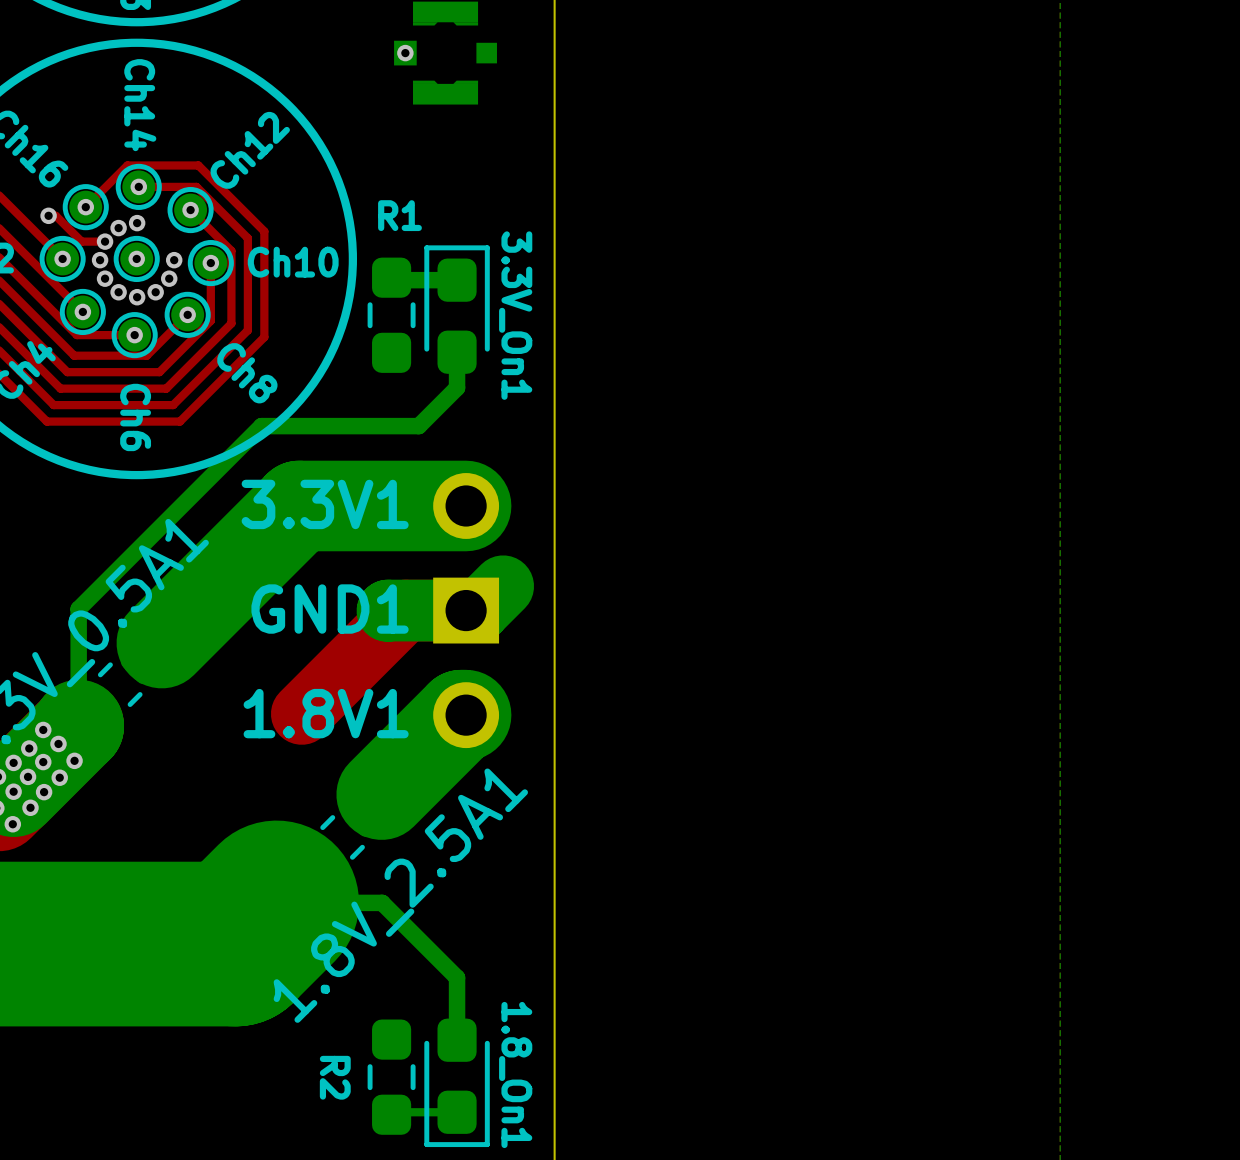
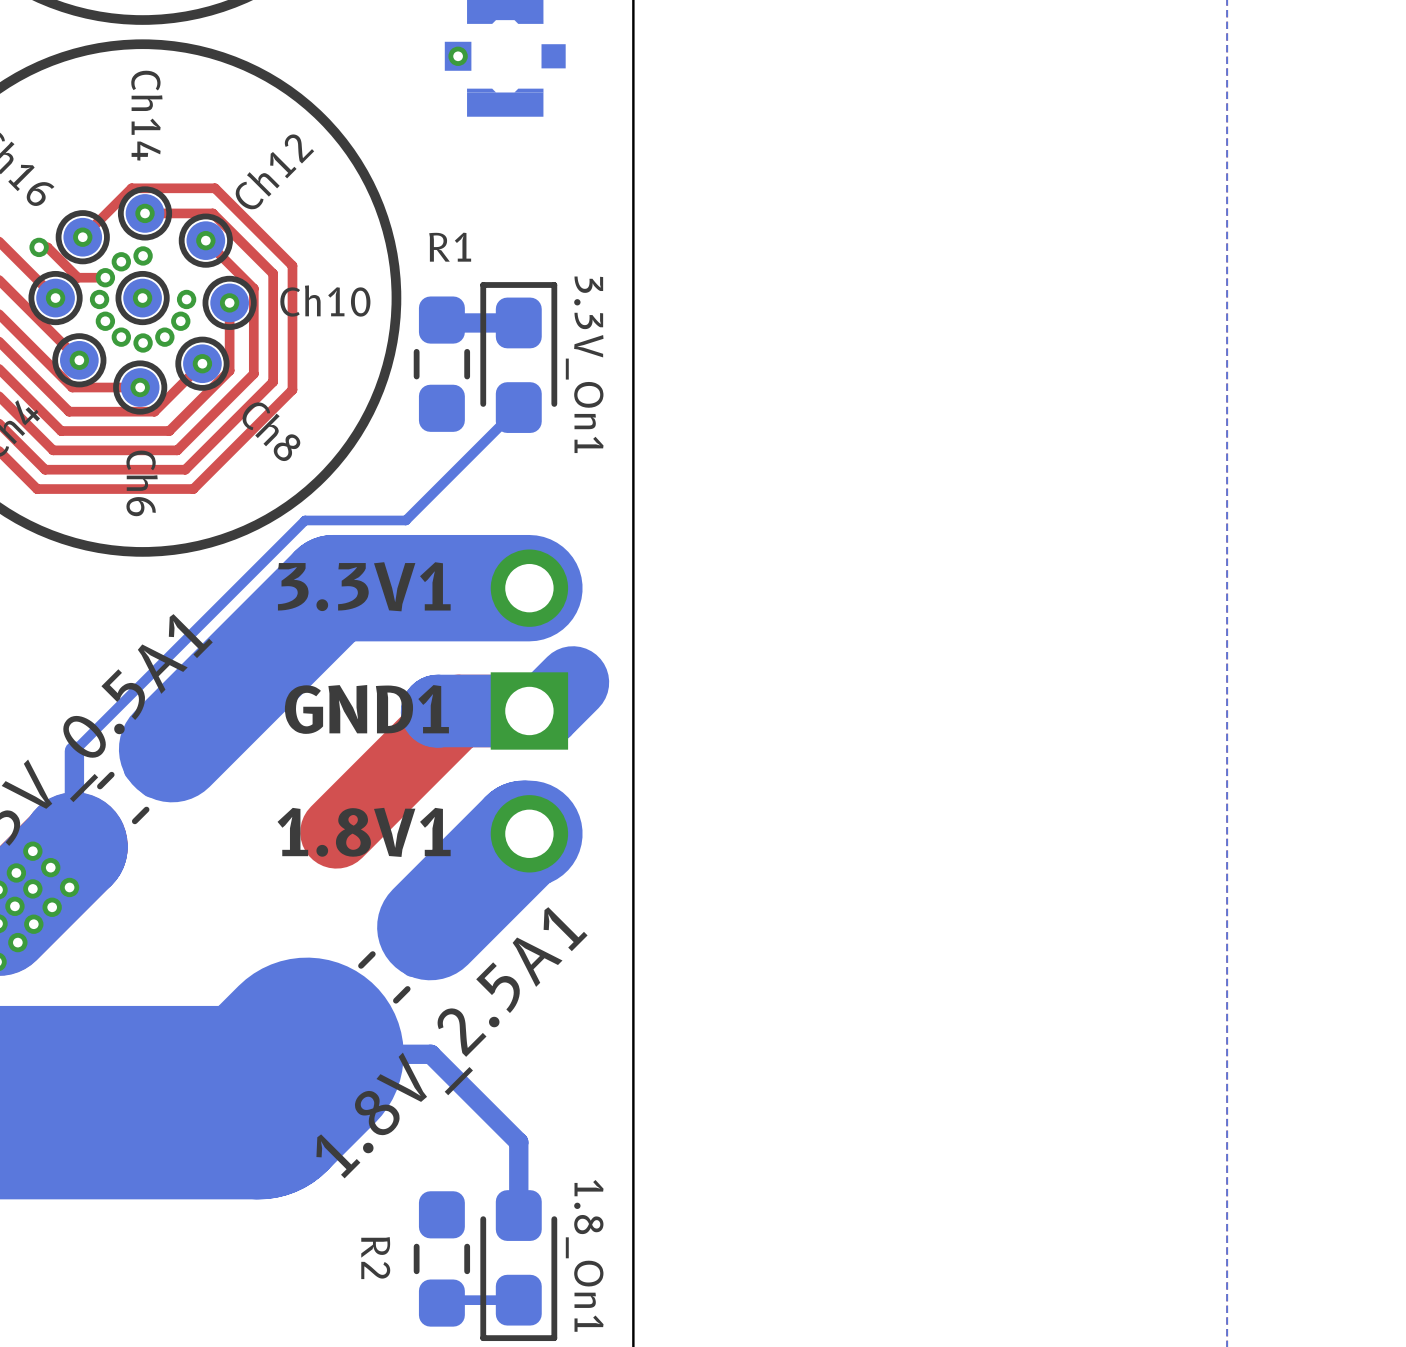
bottom track: (457, 352) (457, 387) (418, 426) (261, 426) (78, 609) (78, 644) -> (518, 407) (405, 520) (305, 520) (74, 751)

